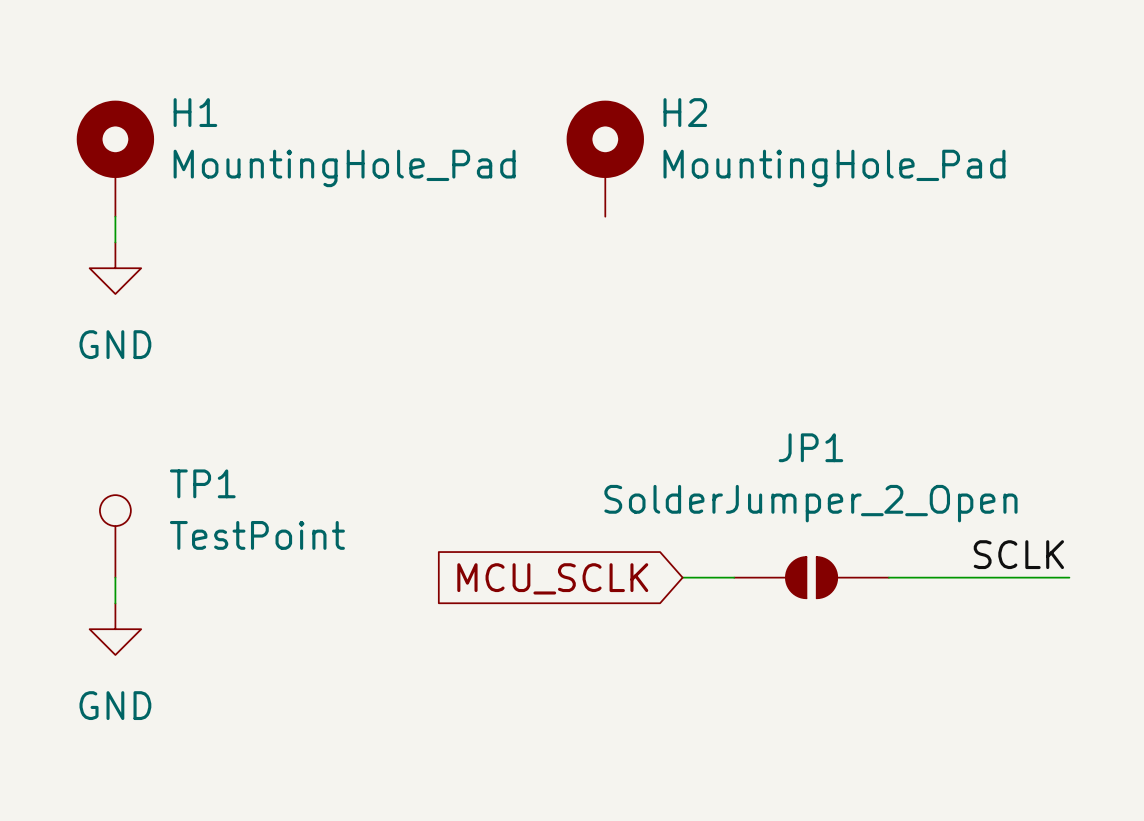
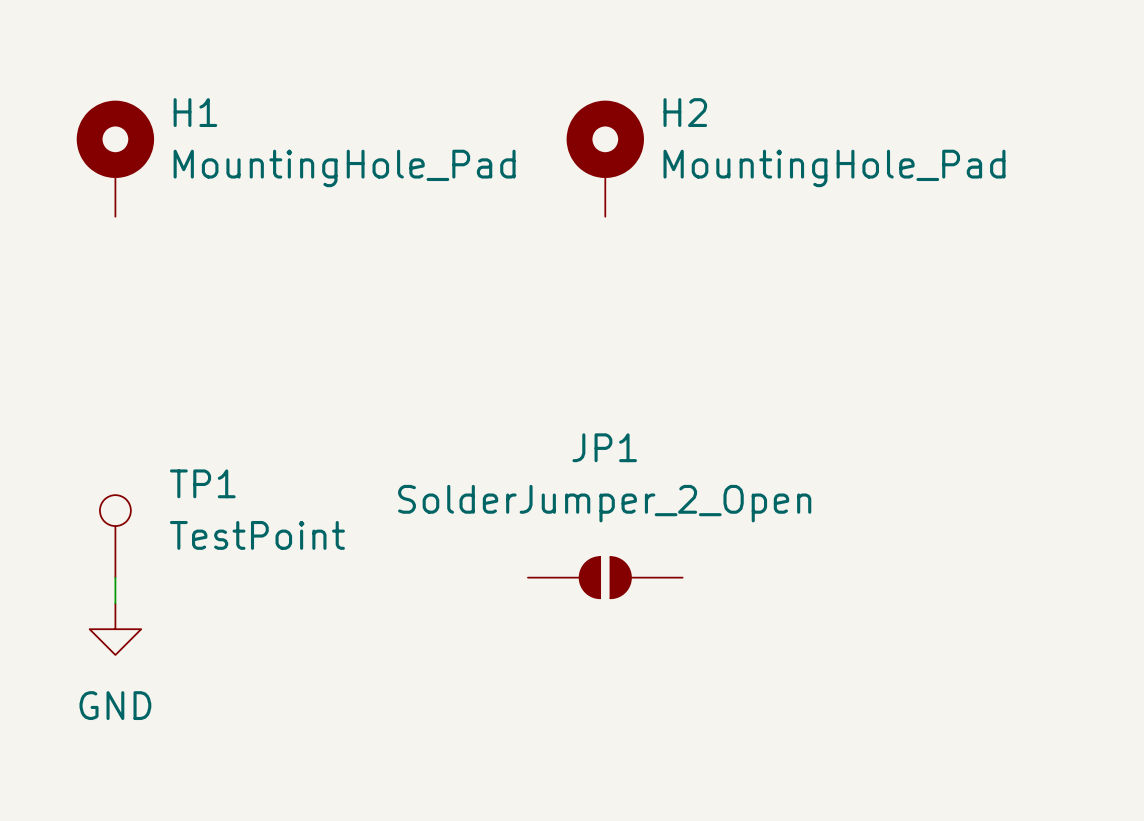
wire: (115, 216) (115, 242) -> none
power symbol: GND (115, 268) -> none
label: SCLK (1018, 554) -> none
wire: (682, 577) (734, 577) -> none
JP1 position: (811, 577) -> (605, 577)
wire: (888, 577) (1069, 577) -> none
global label: MCU_SCLK (552, 578) -> none

